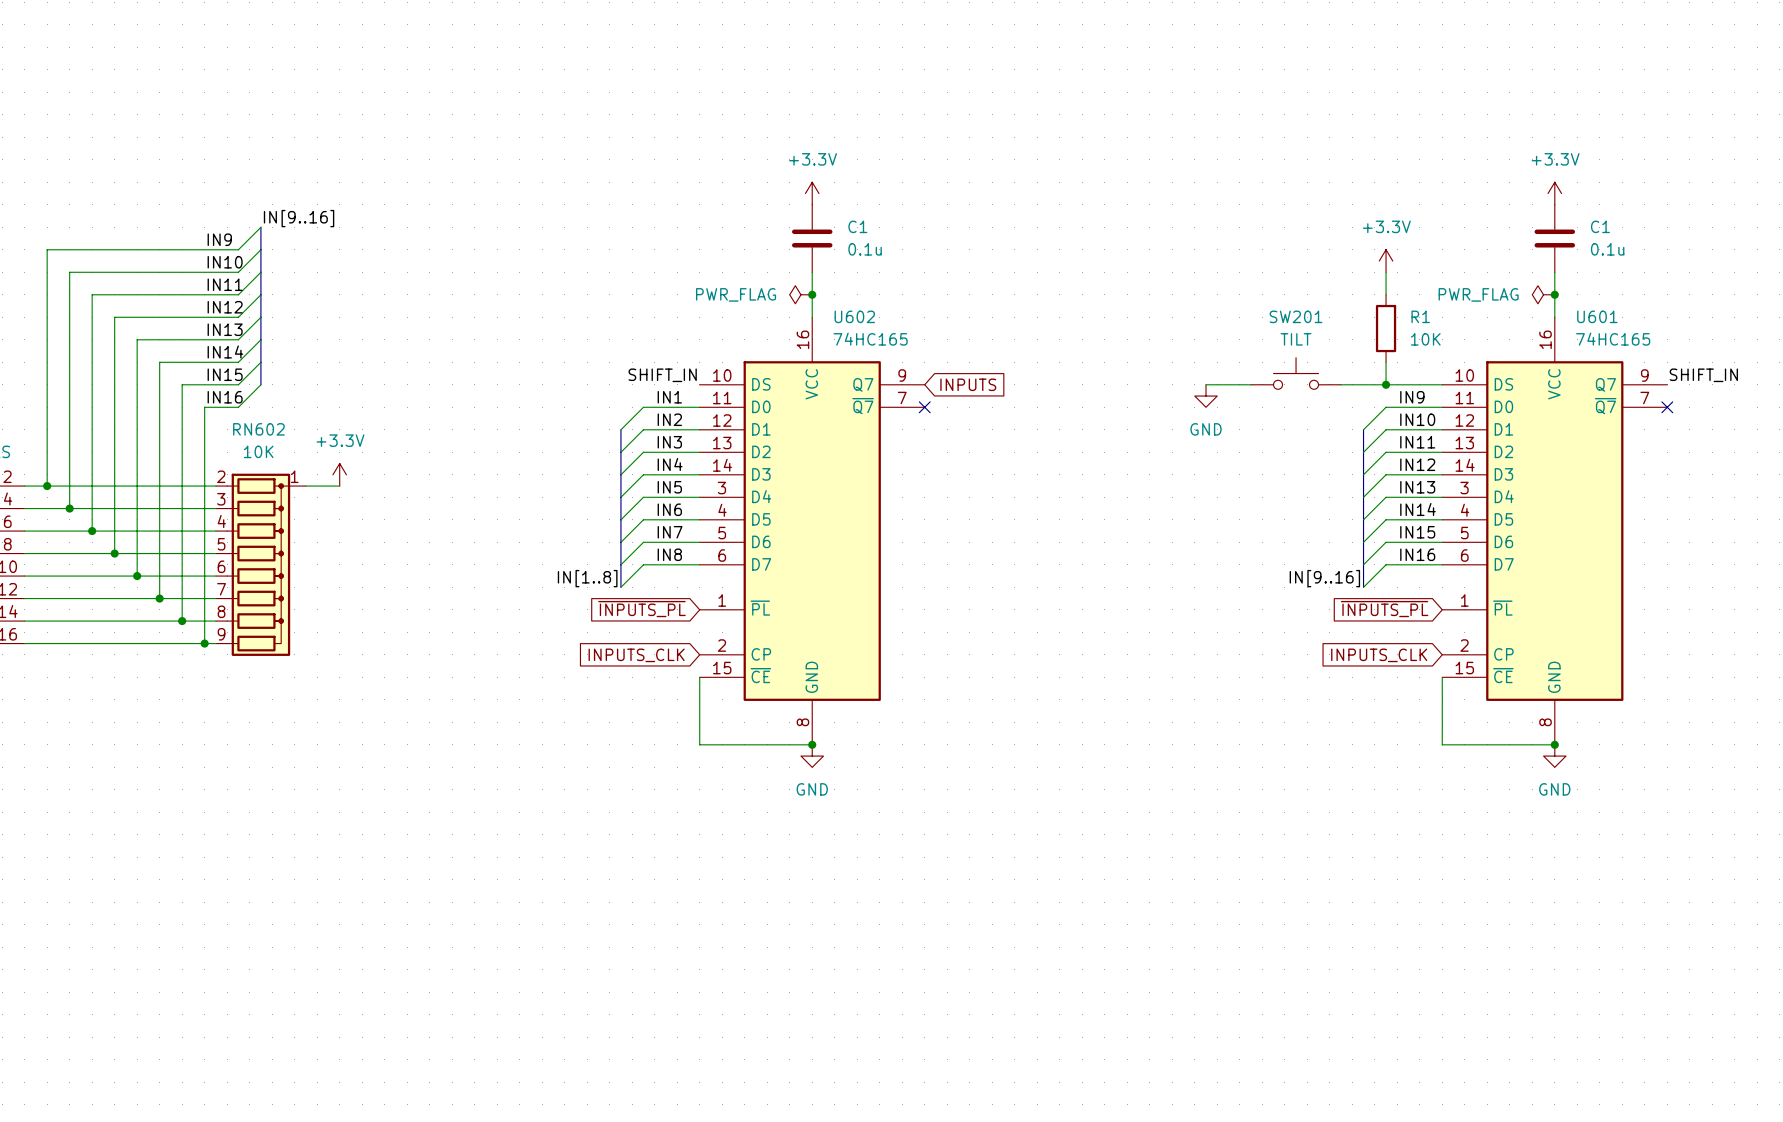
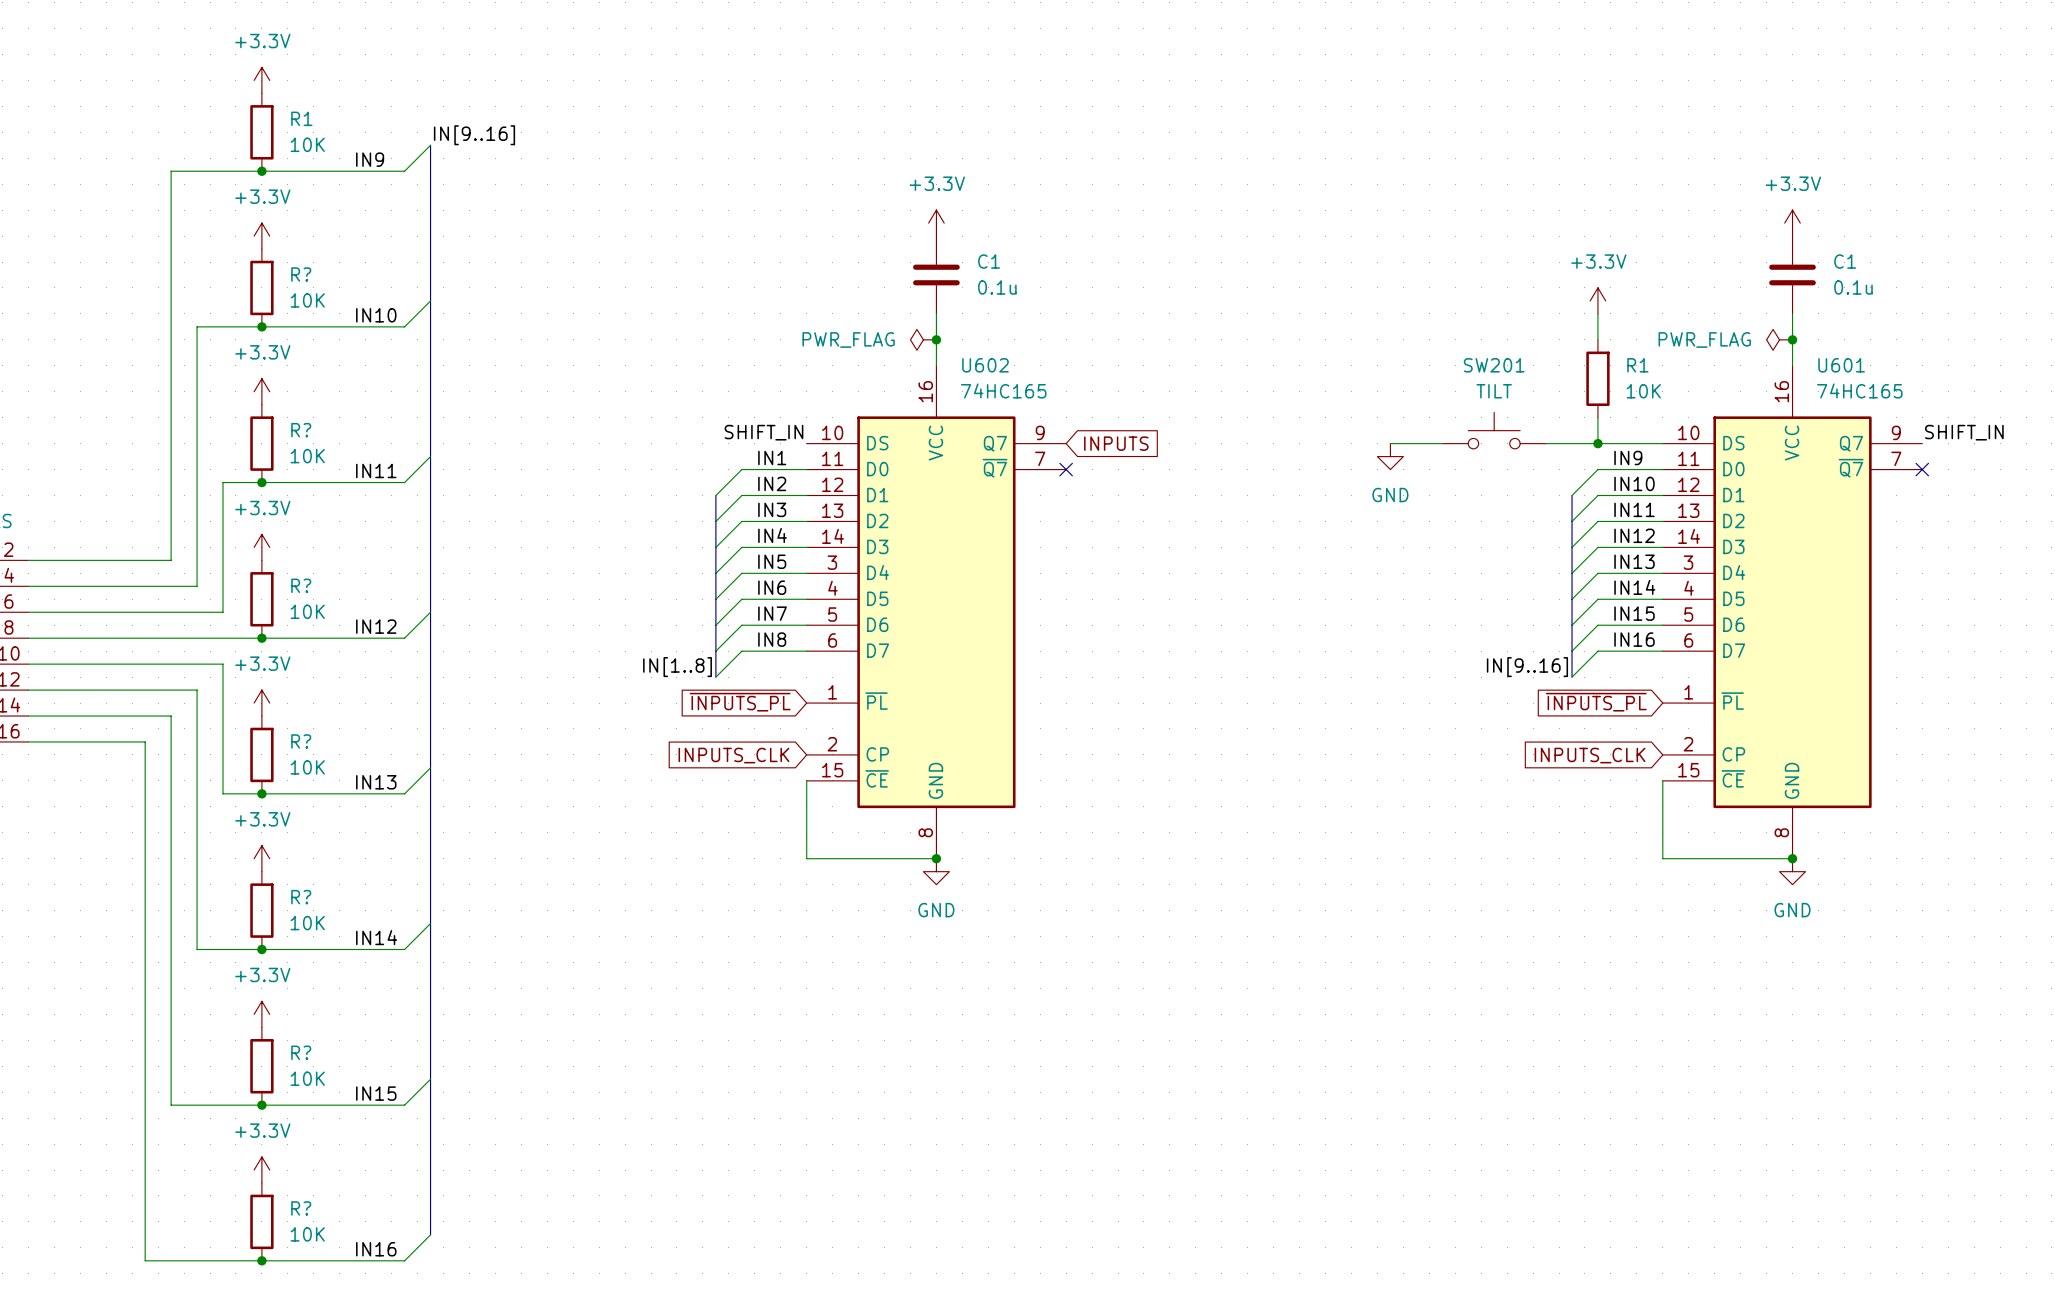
power symbol: none -> +3.3V (261, 80)
R1: none -> 10K (261, 132)
bus: none -> (430, 145) (430, 1234)
junction: none -> (261, 171)
power symbol: none -> +3.3V (261, 236)
label position: IN[9..16] (299, 218) -> IN[9..16] (474, 135)
wire: (260, 227) (238, 249) (47, 249) (47, 486) -> none
bus: (260, 227) (260, 384) -> none
label position: IN9 (219, 239) -> IN9 (370, 159)
R?: none -> 10K (261, 287)
wire: (260, 249) (238, 272) (69, 272) (69, 508) -> none
label position: IN10 (225, 262) -> IN10 (376, 315)
wire: (260, 272) (238, 294) (92, 294) (92, 531) -> none
junction: none -> (261, 326)
label position: IN11 (225, 284) -> IN11 (376, 470)
wire: (260, 294) (238, 317) (114, 317) (114, 553) -> none
label: IN12 (225, 307) -> none
wire: (260, 317) (238, 339) (137, 339) (137, 576) -> none
label: IN13 (225, 329) -> none
power symbol: none -> +3.3V (261, 391)
wire: (260, 339) (238, 362) (159, 362) (159, 598) -> none
label: IN14 (225, 351) -> none
wire: (260, 362) (238, 384) (182, 384) (182, 621) -> none
label: IN15 (225, 374) -> none
R?: none -> 10K (261, 443)
wire: (260, 384) (238, 407) (204, 407) (204, 643) -> none
label: IN16 (225, 397) -> none
junction: none -> (261, 482)
power symbol: none -> +3.3V (261, 547)
power symbol: +3.3V (339, 474) -> none
junction: (47, 486) -> none
wire: (148, 486) (215, 486) -> (171, 560) (171, 171) (404, 171) (430, 145)
wire: (305, 486) (339, 486) -> none
junction: (69, 508) -> none
wire: (170, 508) (215, 508) -> (197, 586) (197, 326) (404, 326) (430, 300)
R?: none -> 10K (261, 599)
junction: (92, 531) -> none
wire: (193, 531) (215, 531) -> (223, 612) (223, 482) (404, 482) (430, 456)
wire: none -> (430, 612) (404, 638) (248, 638)
label: none -> IN12 (376, 626)
junction: (114, 553) -> none
junction: none -> (261, 638)
RN602: 10K (260, 564) -> none
junction: (137, 576) -> none
wire: (193, 576) (215, 576) -> (223, 664) (223, 793) (404, 793) (430, 767)
junction: (159, 598) -> none
wire: (170, 598) (215, 598) -> (197, 690) (197, 949) (404, 949) (430, 923)
power symbol: none -> +3.3V (261, 703)
wire: (148, 621) (215, 621) -> (171, 716) (171, 1105) (404, 1105) (430, 1079)
junction: (182, 621) -> none
wire: (125, 643) (215, 643) -> (145, 741) (145, 1260) (404, 1260) (430, 1234)
junction: (204, 643) -> none
R?: none -> 10K (261, 754)
label: none -> IN13 (376, 782)
junction: none -> (261, 793)
power symbol: none -> +3.3V (261, 858)
R?: none -> 10K (261, 910)
label: none -> IN14 (376, 937)
junction: none -> (261, 949)
power symbol: none -> +3.3V (261, 1014)
R?: none -> 10K (261, 1066)
label: none -> IN15 (376, 1093)
junction: none -> (261, 1105)
power symbol: none -> +3.3V (261, 1170)
R?: none -> 10K (261, 1221)
label: none -> IN16 (376, 1249)
junction: none -> (261, 1260)

